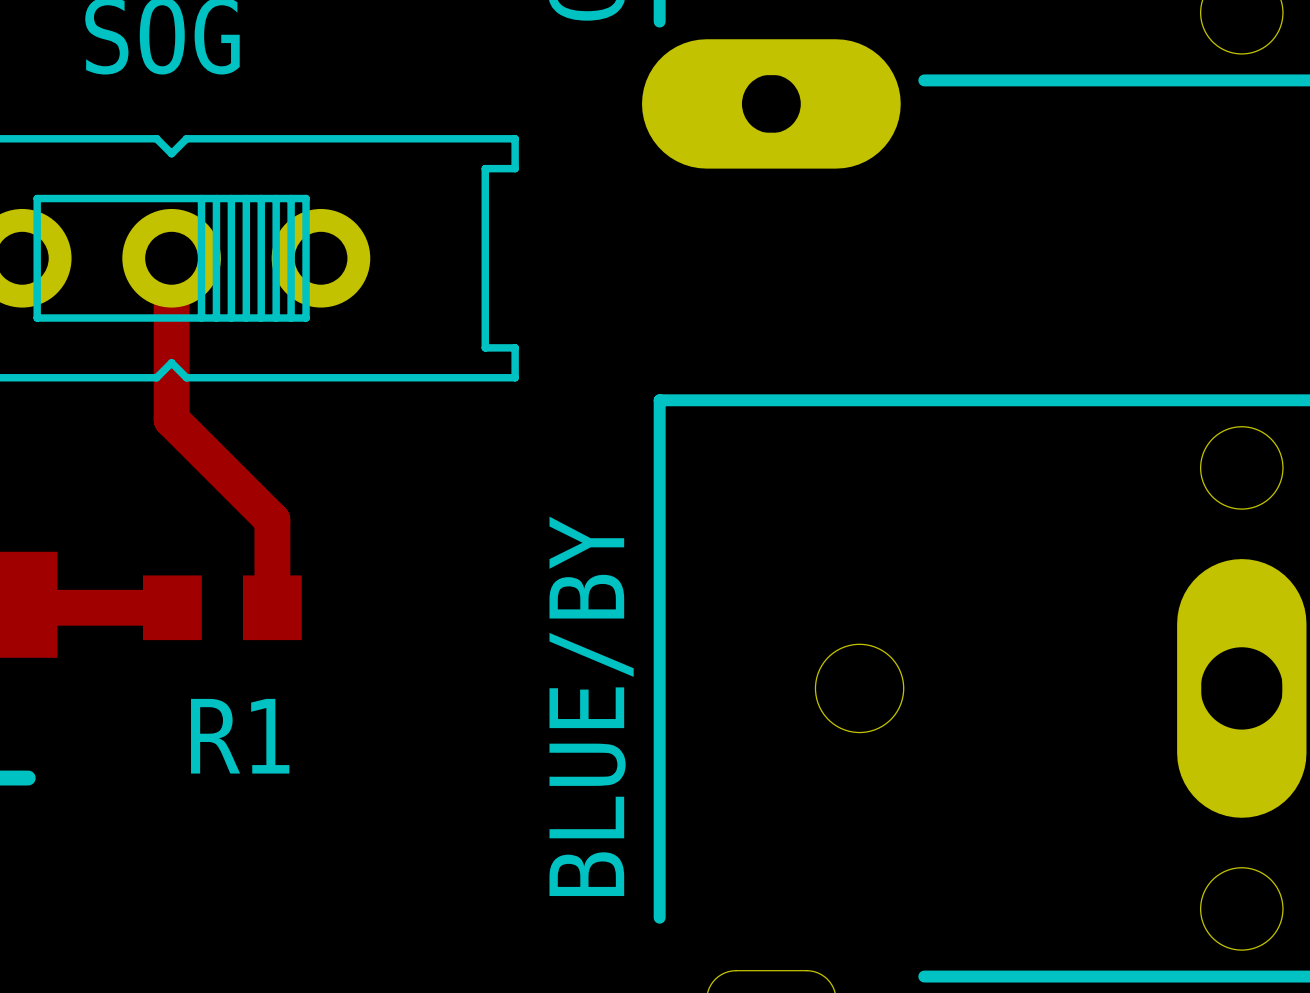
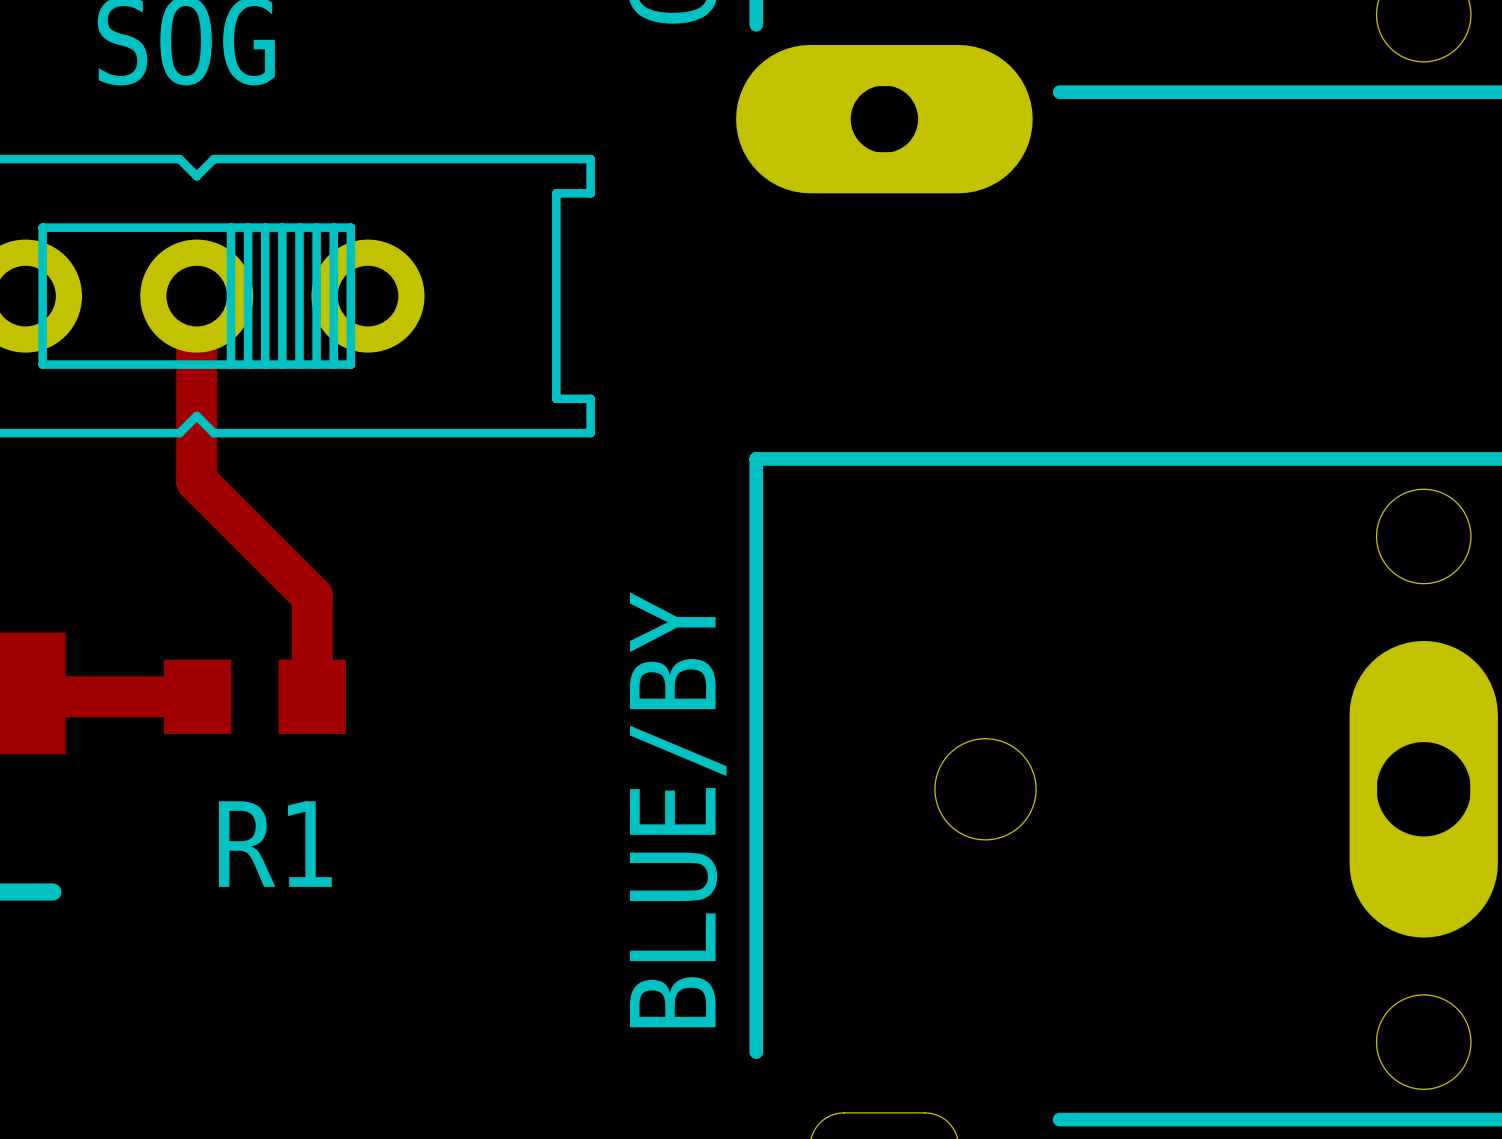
line: none -> (32, 892) (52, 892)

